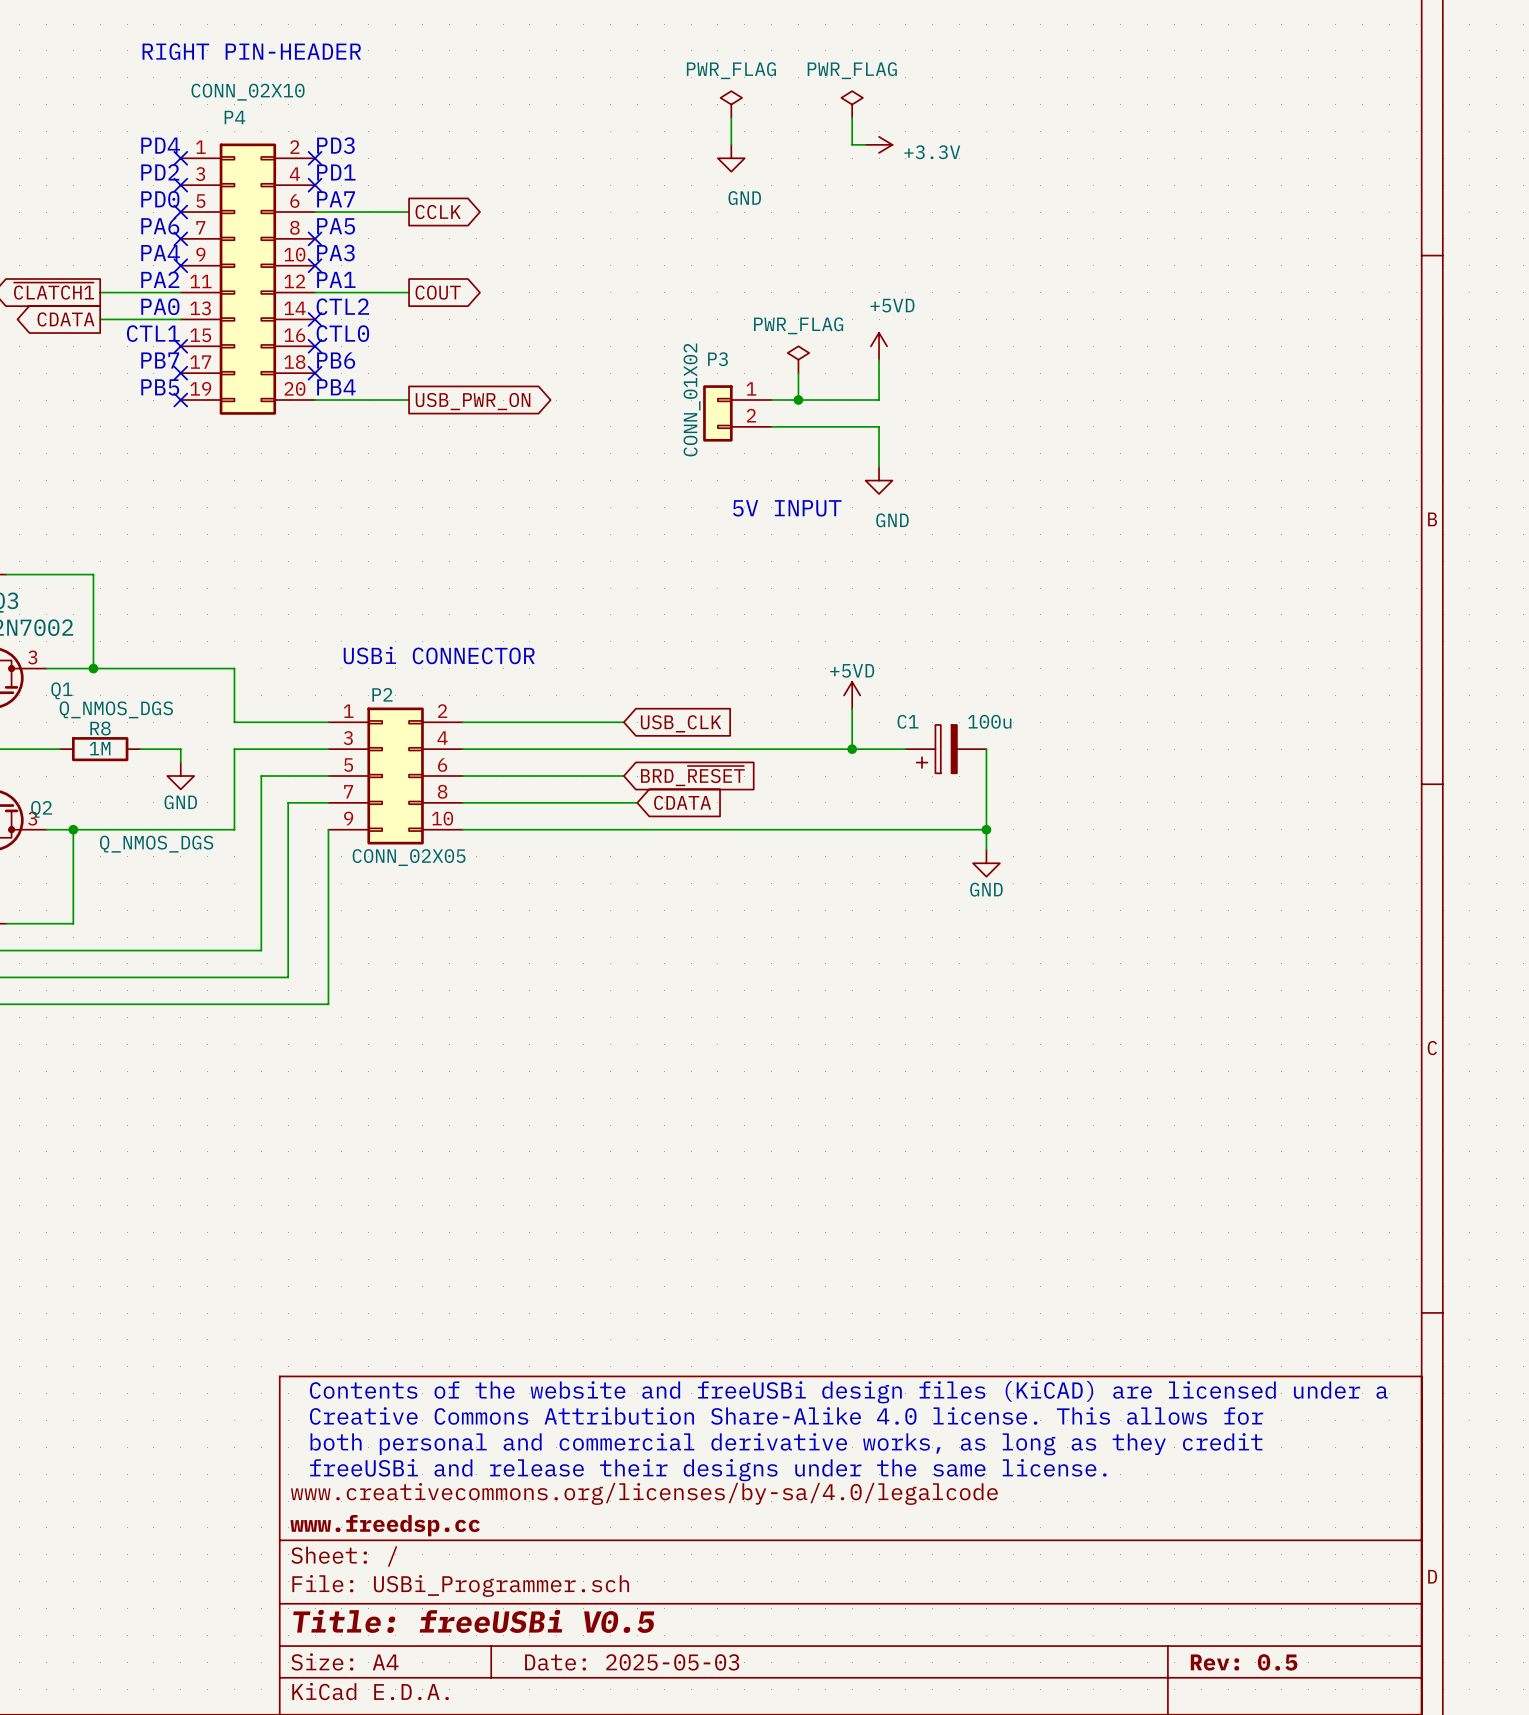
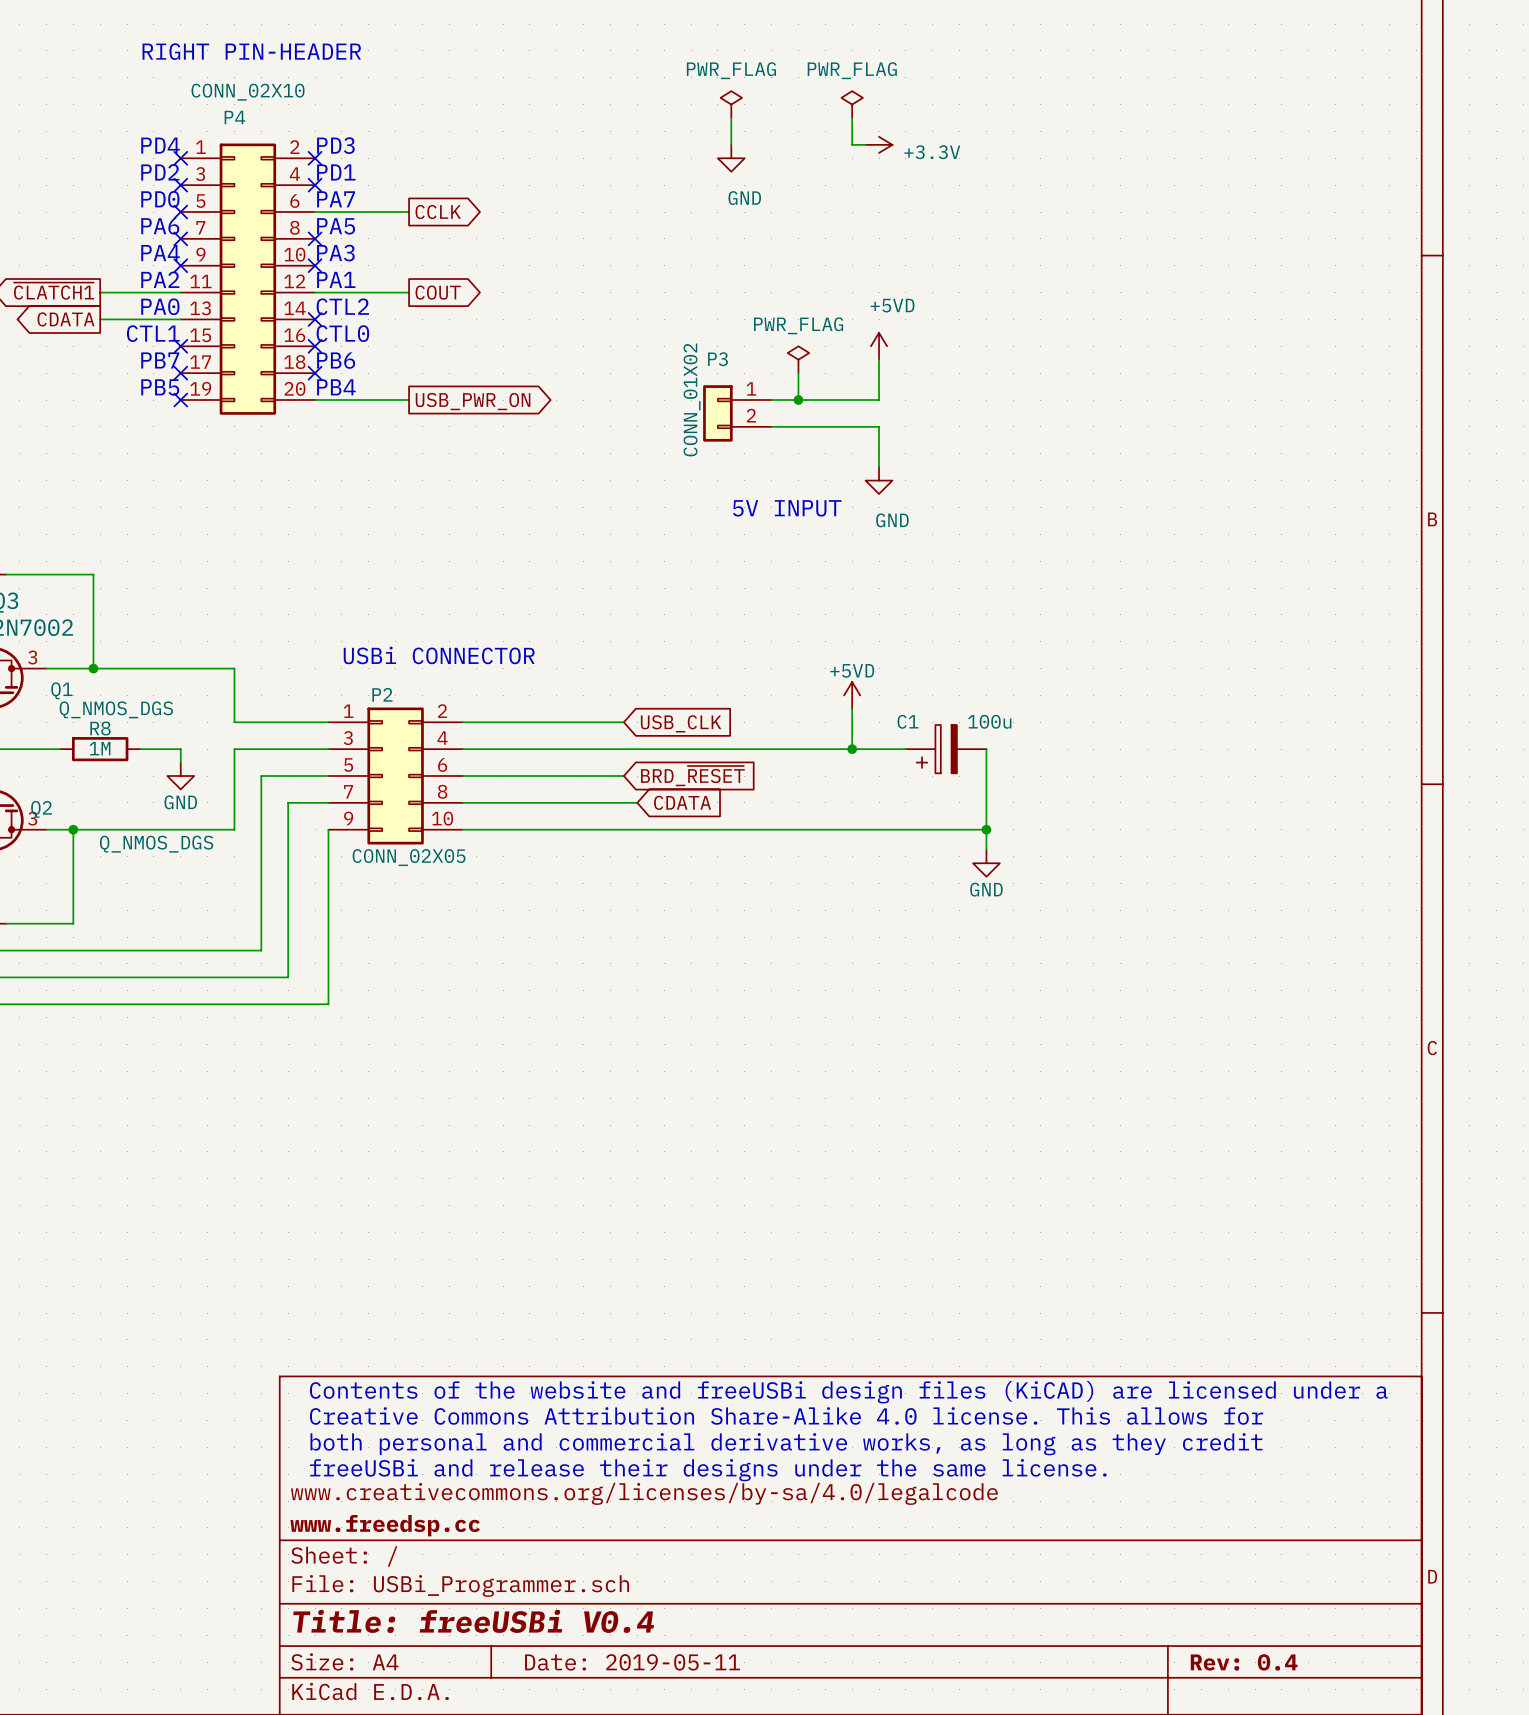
title block: Title: freeUSBi V0.5 (473, 1621) -> Title: freeUSBi V0.4 (473, 1621)
title block: Date: 2025-05-03 (632, 1662) -> Date: 2019-05-11 (632, 1662)
title block: Rev: 0.5 (1244, 1662) -> Rev: 0.4 (1244, 1662)

